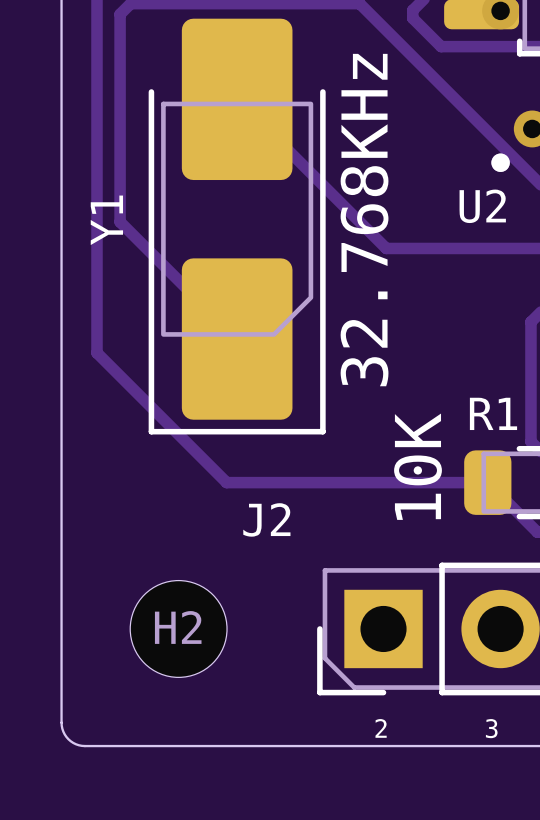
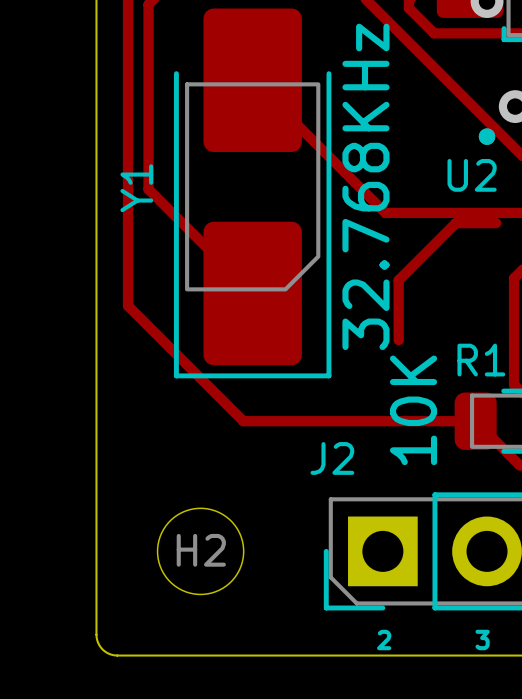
track: none -> (496, 223) (455, 223) (398, 280) (398, 340)
J2 name position: J2 (266, 519) -> J2 (332, 458)

